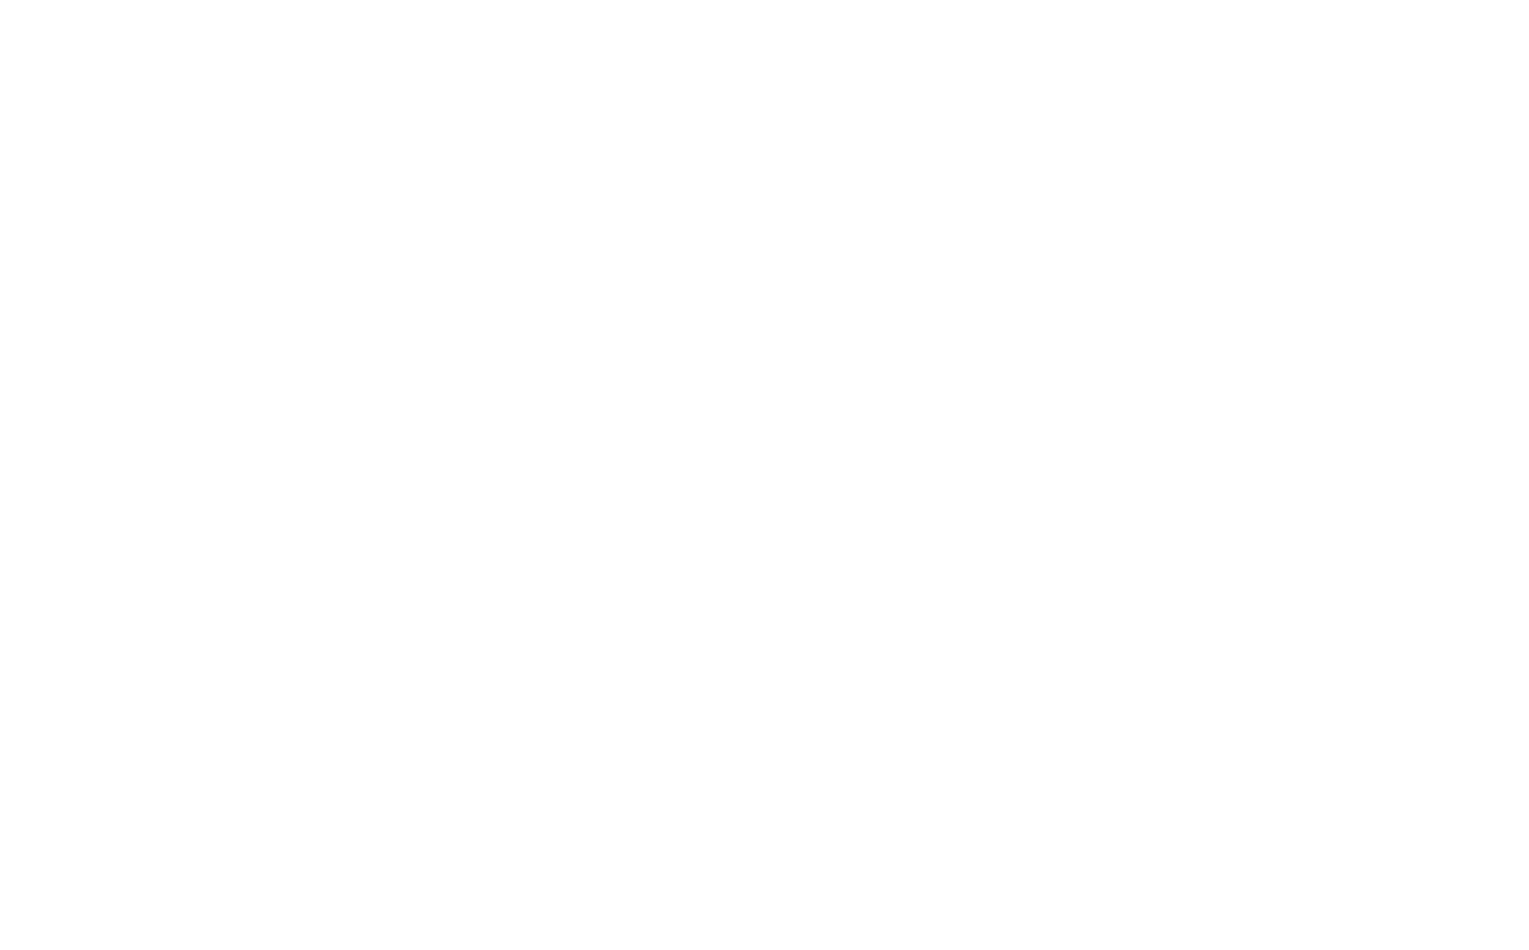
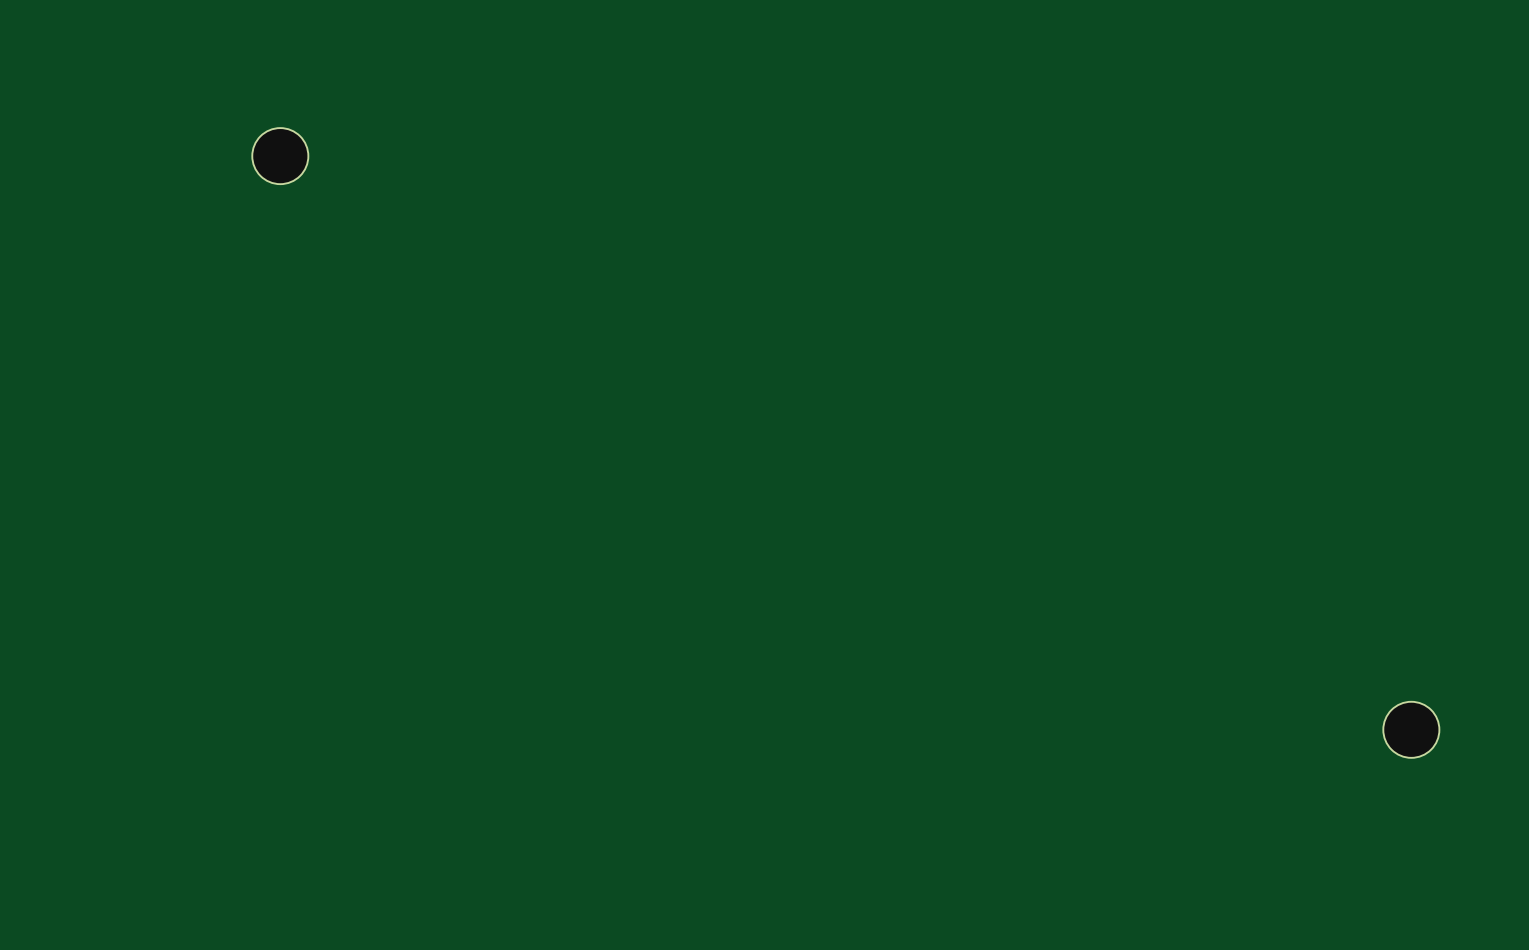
part: none -> (280, 156)
part: none -> (1411, 729)

